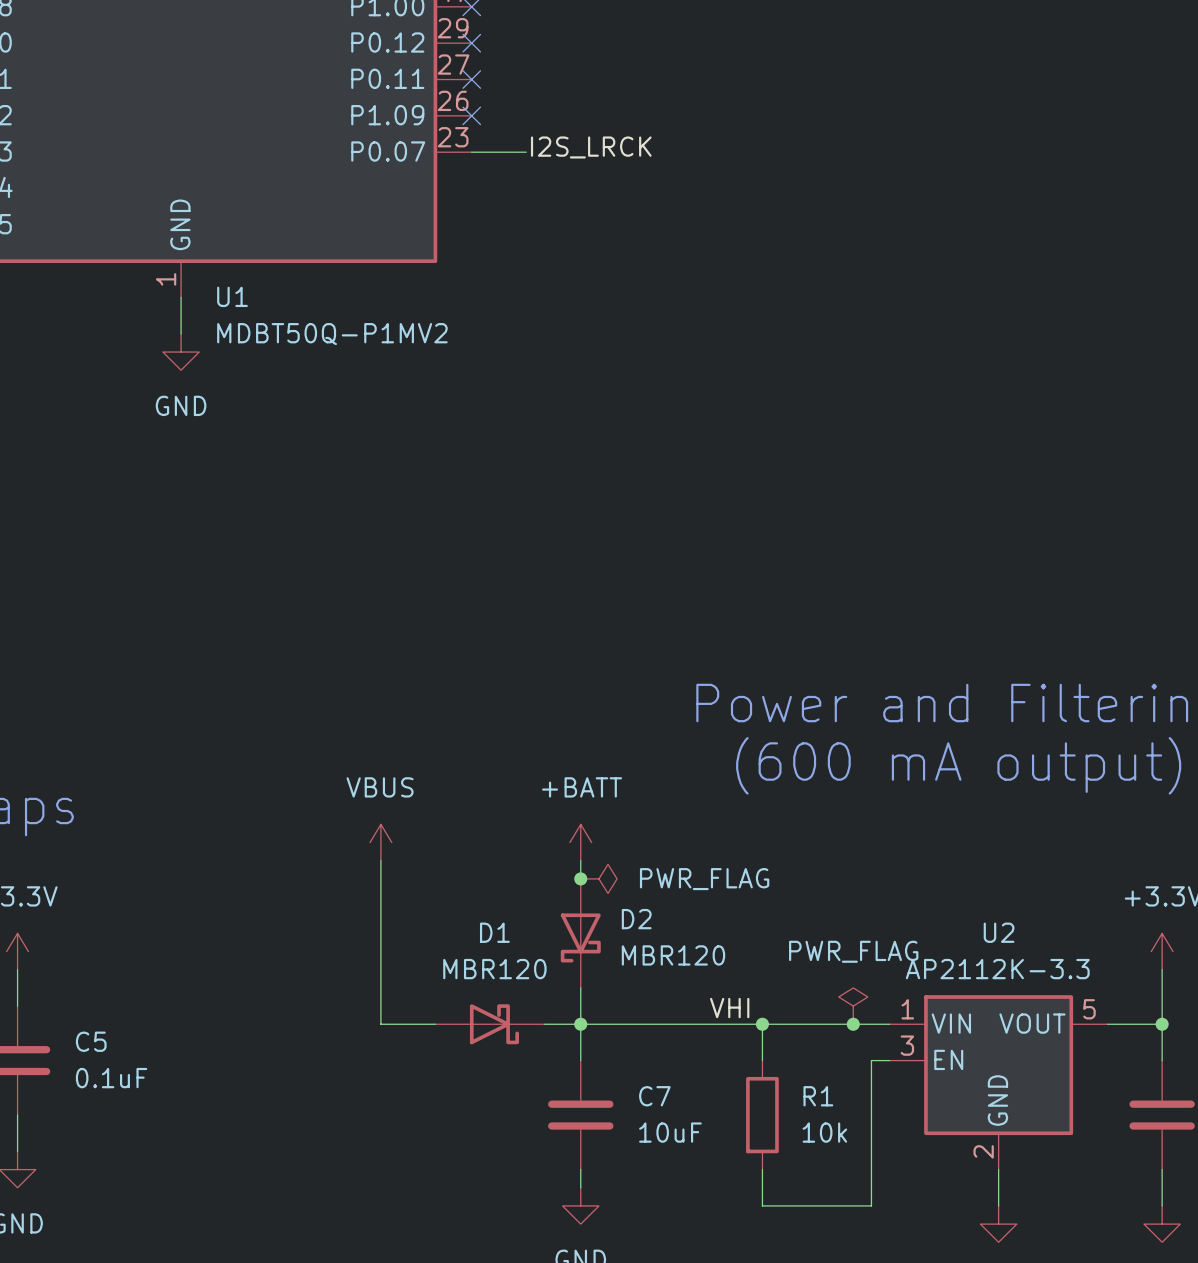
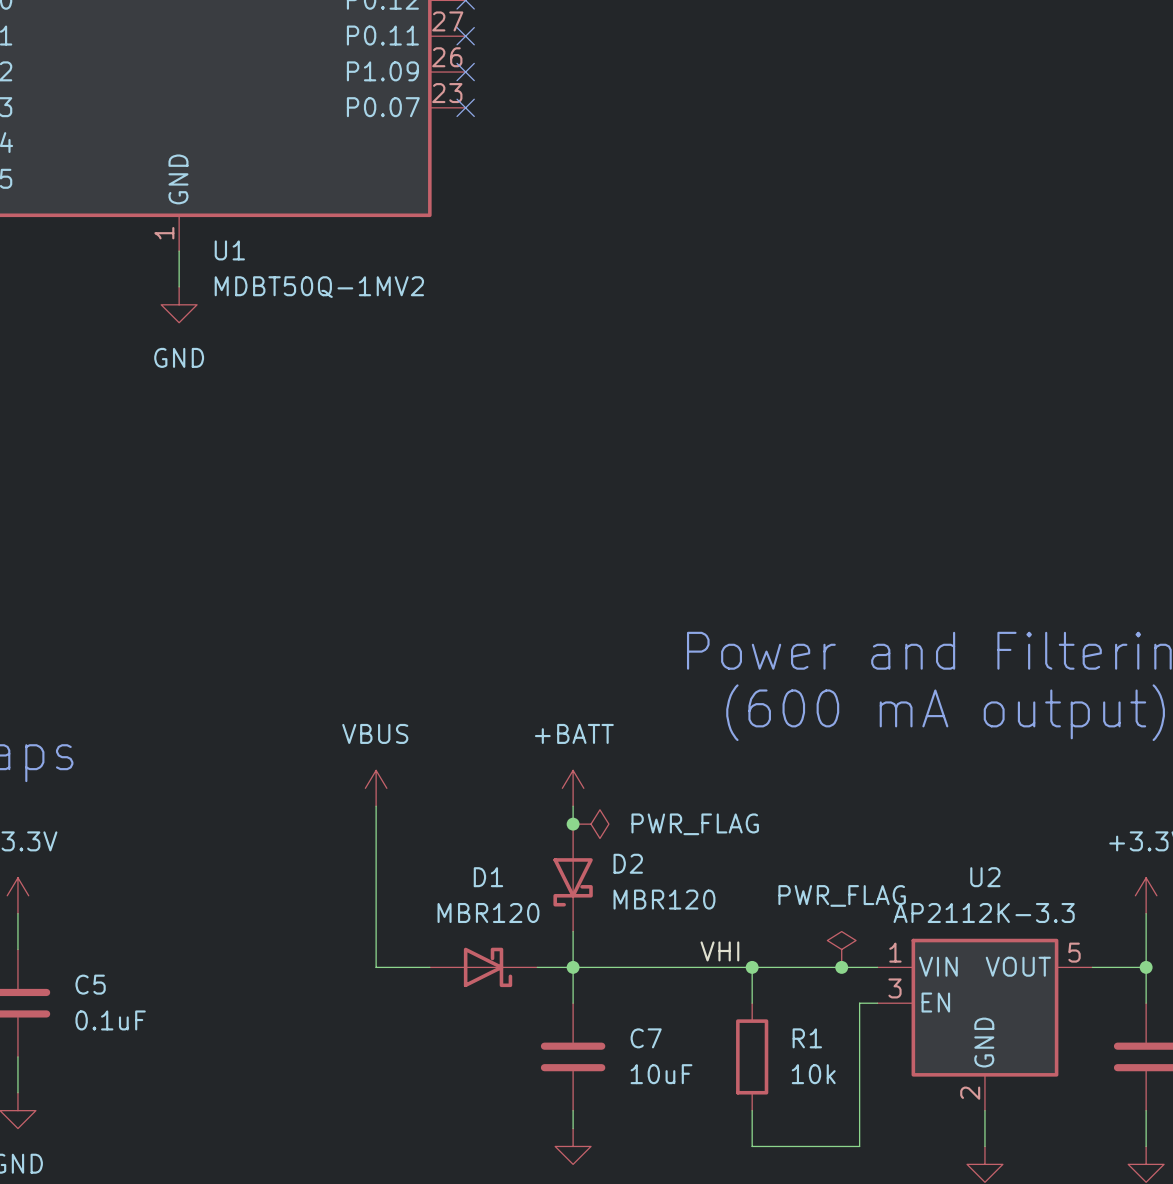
label: I2S_LRCK (591, 147) -> none
wire: (471, 152) (526, 152) -> none
no-connect mark: none -> (465, 107)
U1 value: MDBT50Q-P1MV2 (332, 334) -> MDBT50Q-1MV2 (319, 287)

